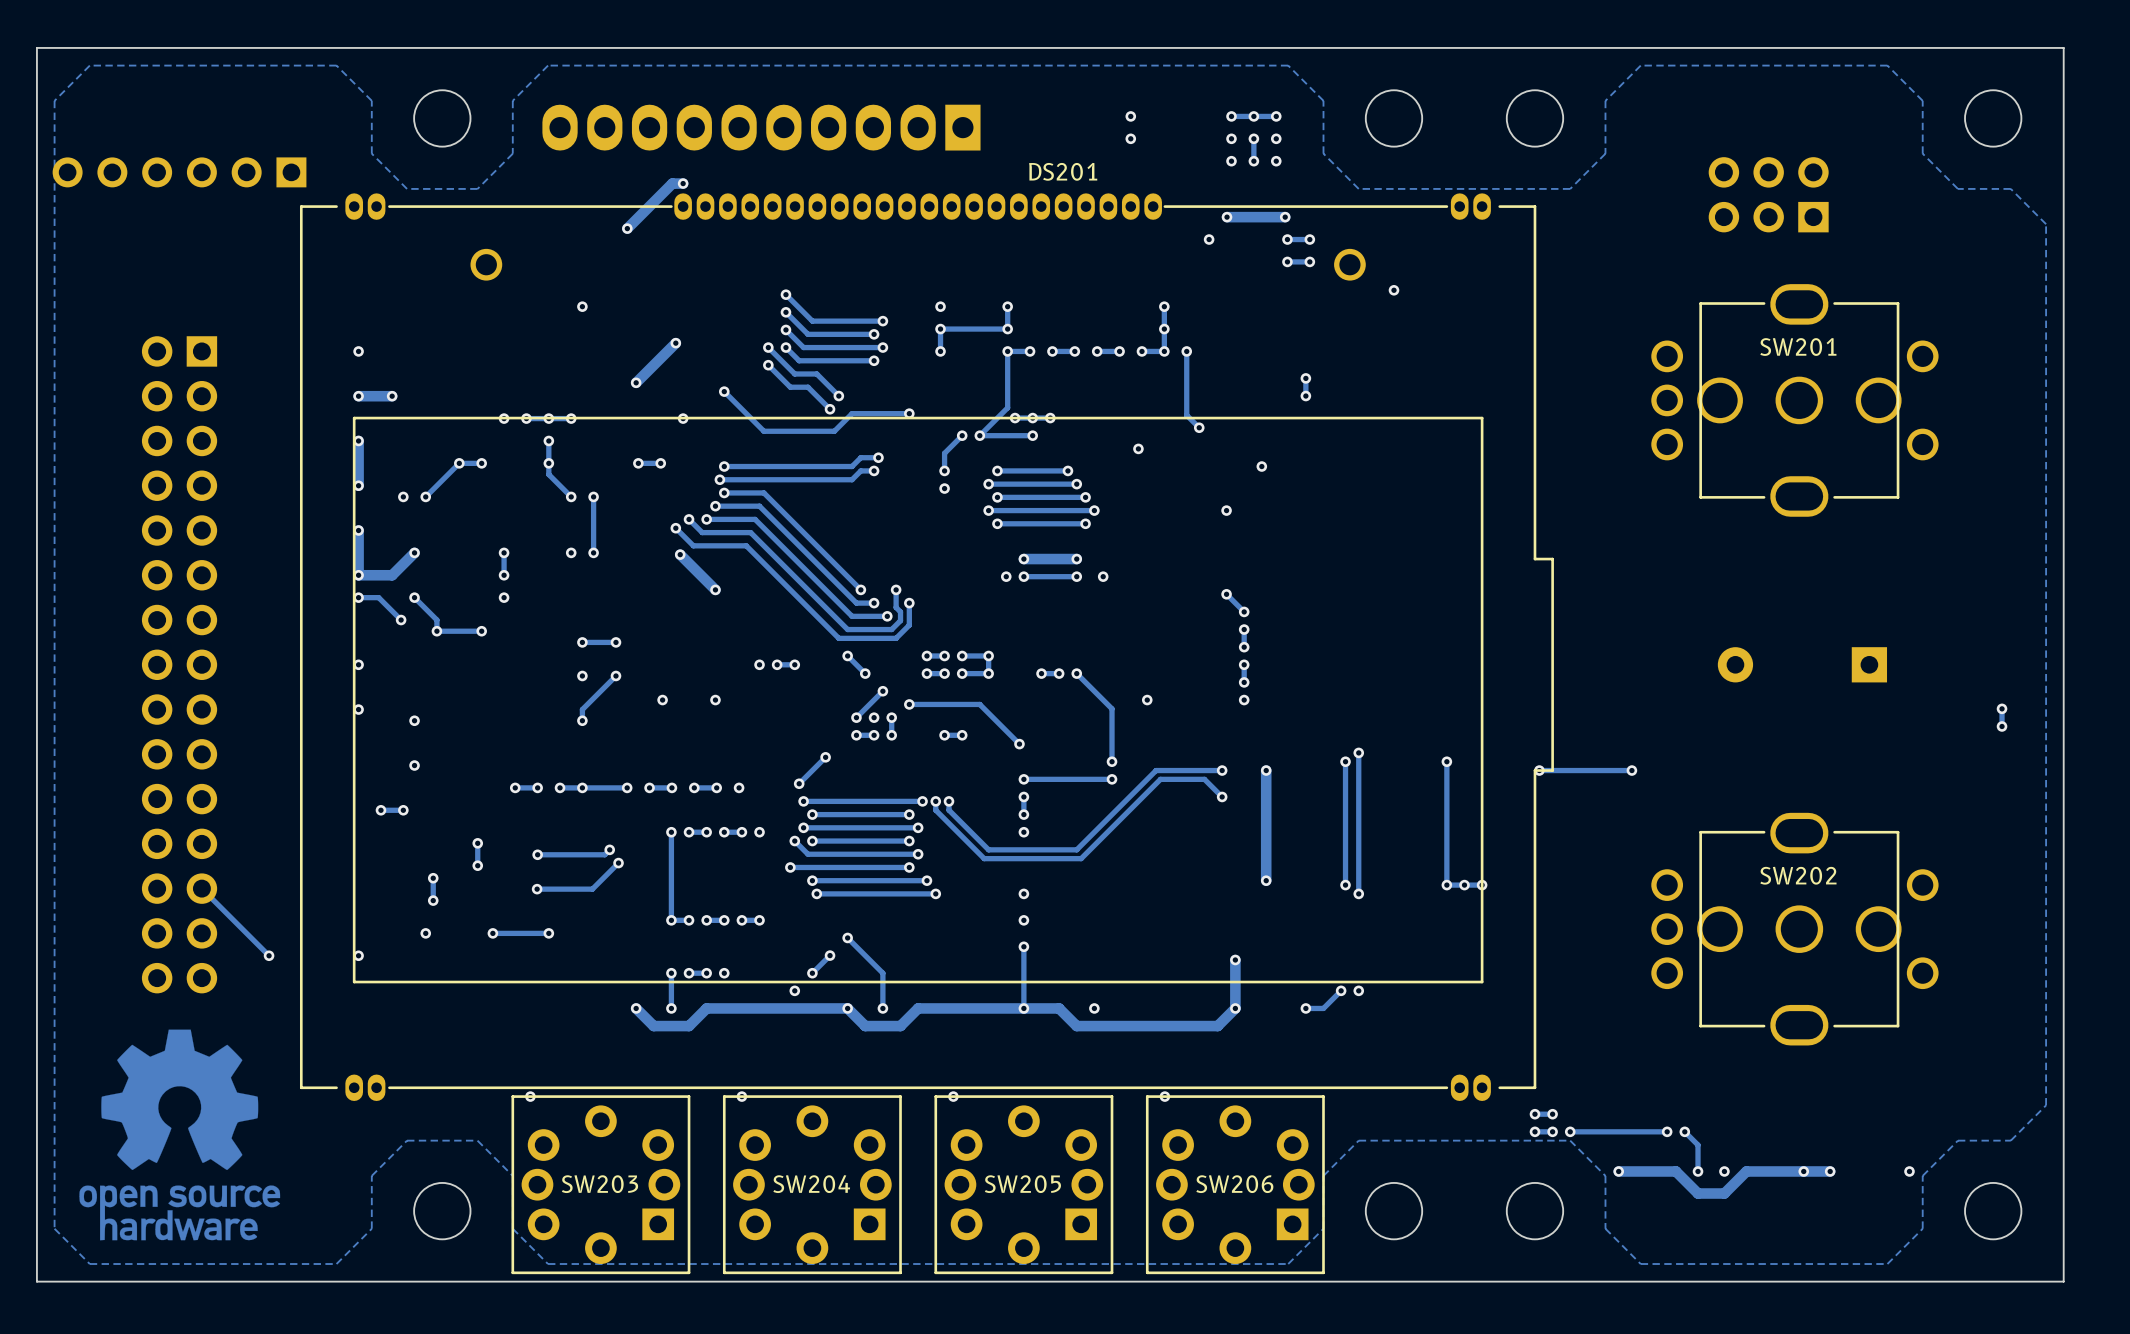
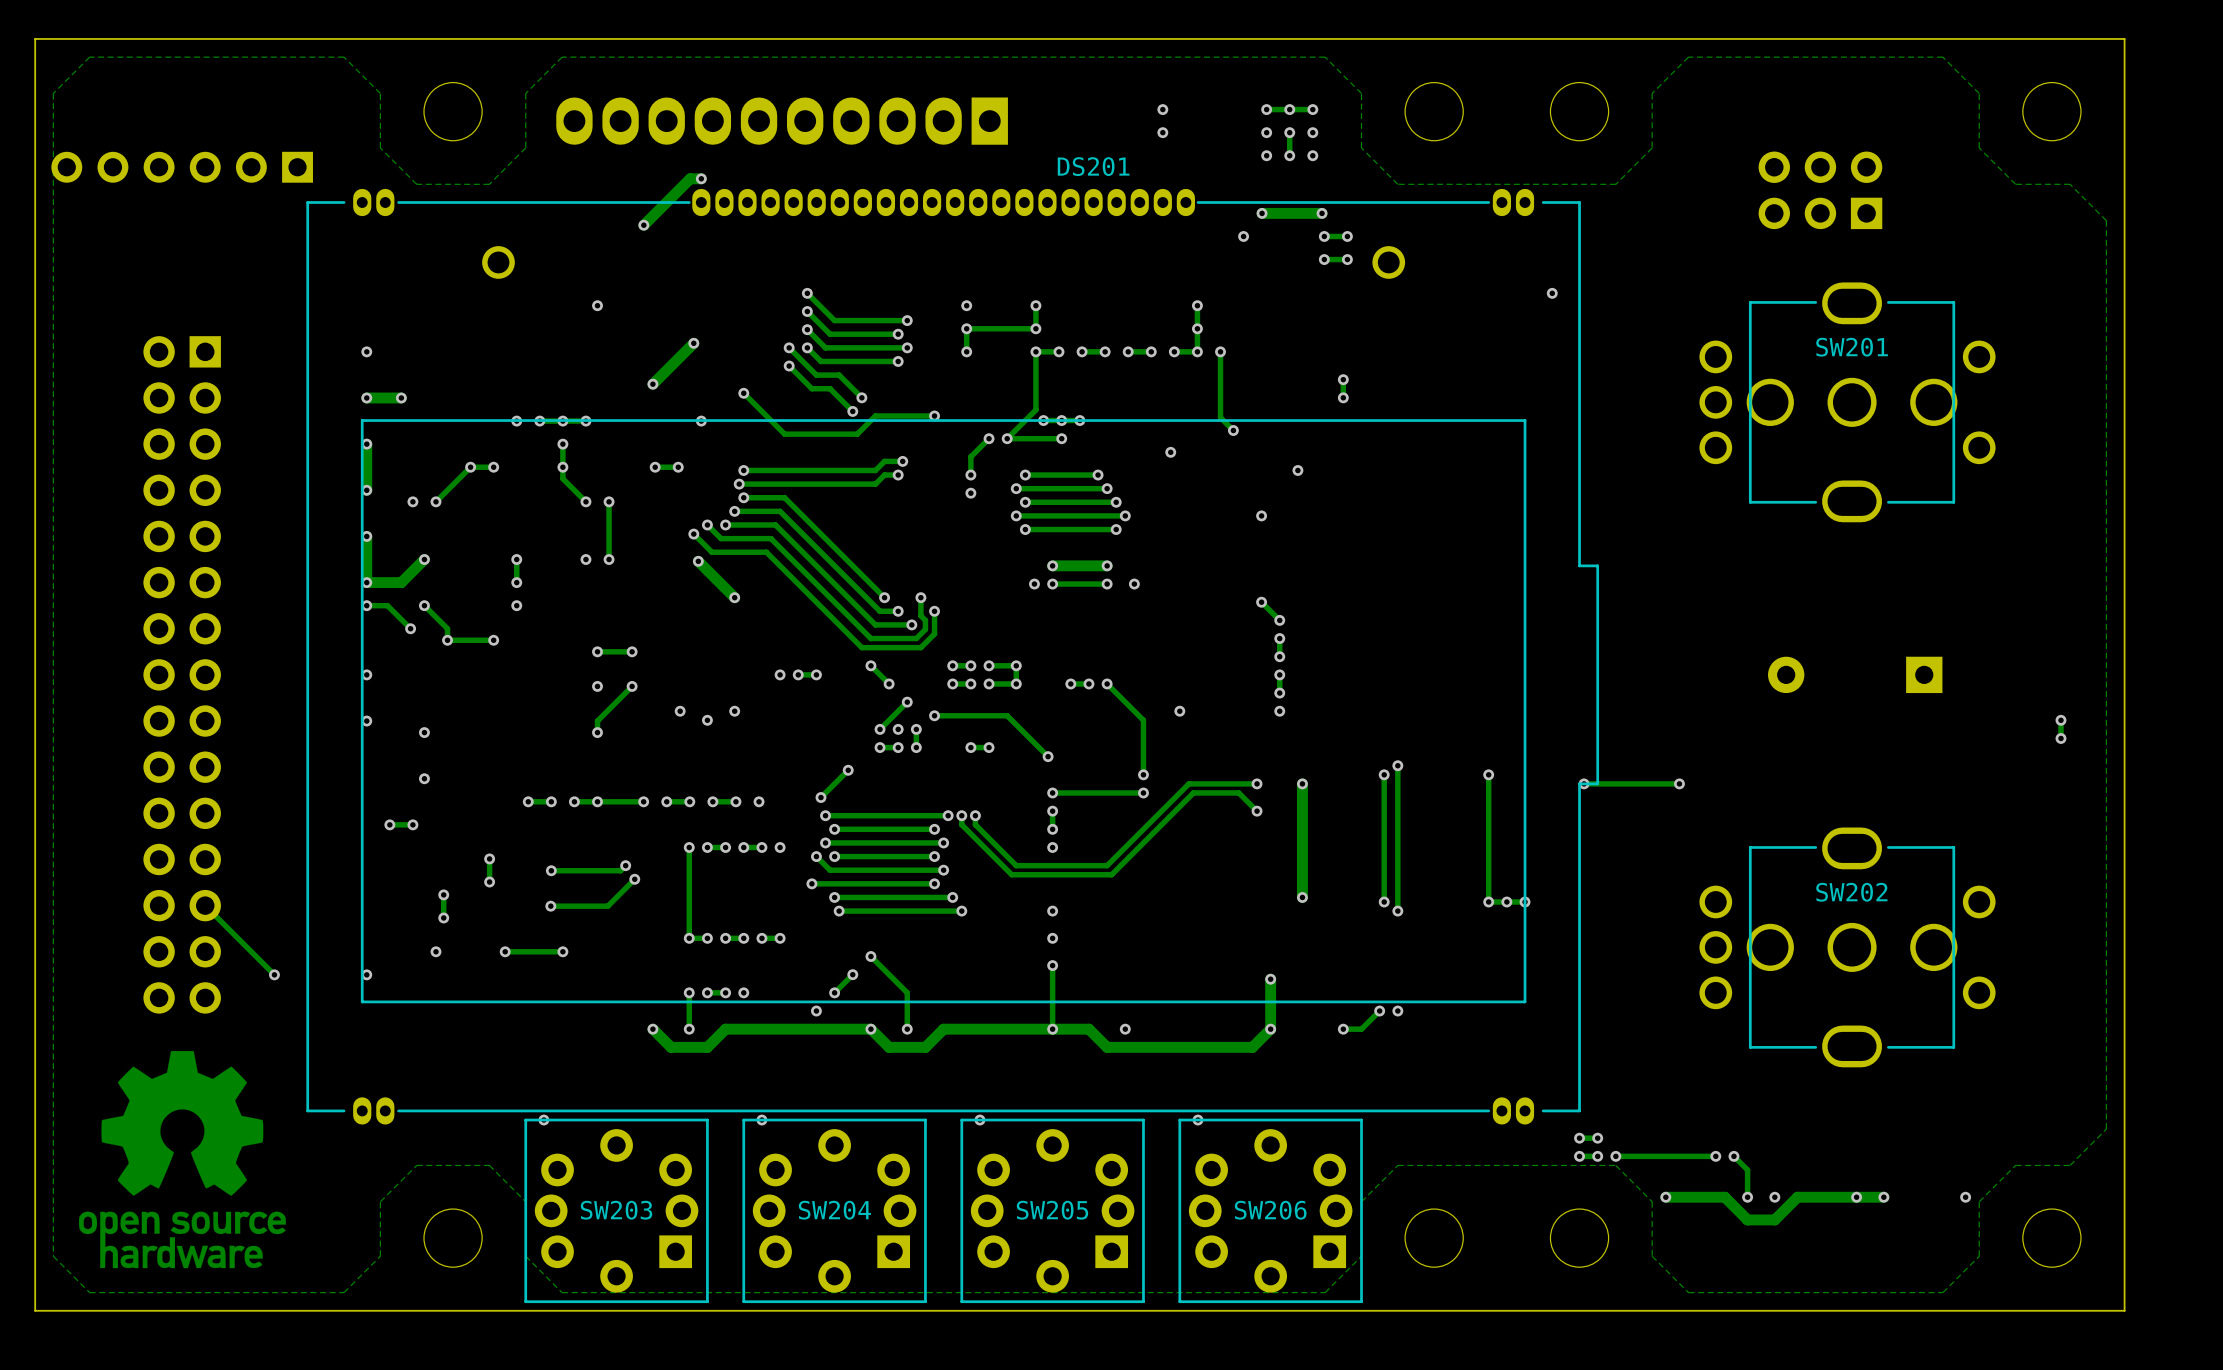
via: (1393, 290) -> none
via: none -> (1552, 293)
via: none -> (707, 720)

